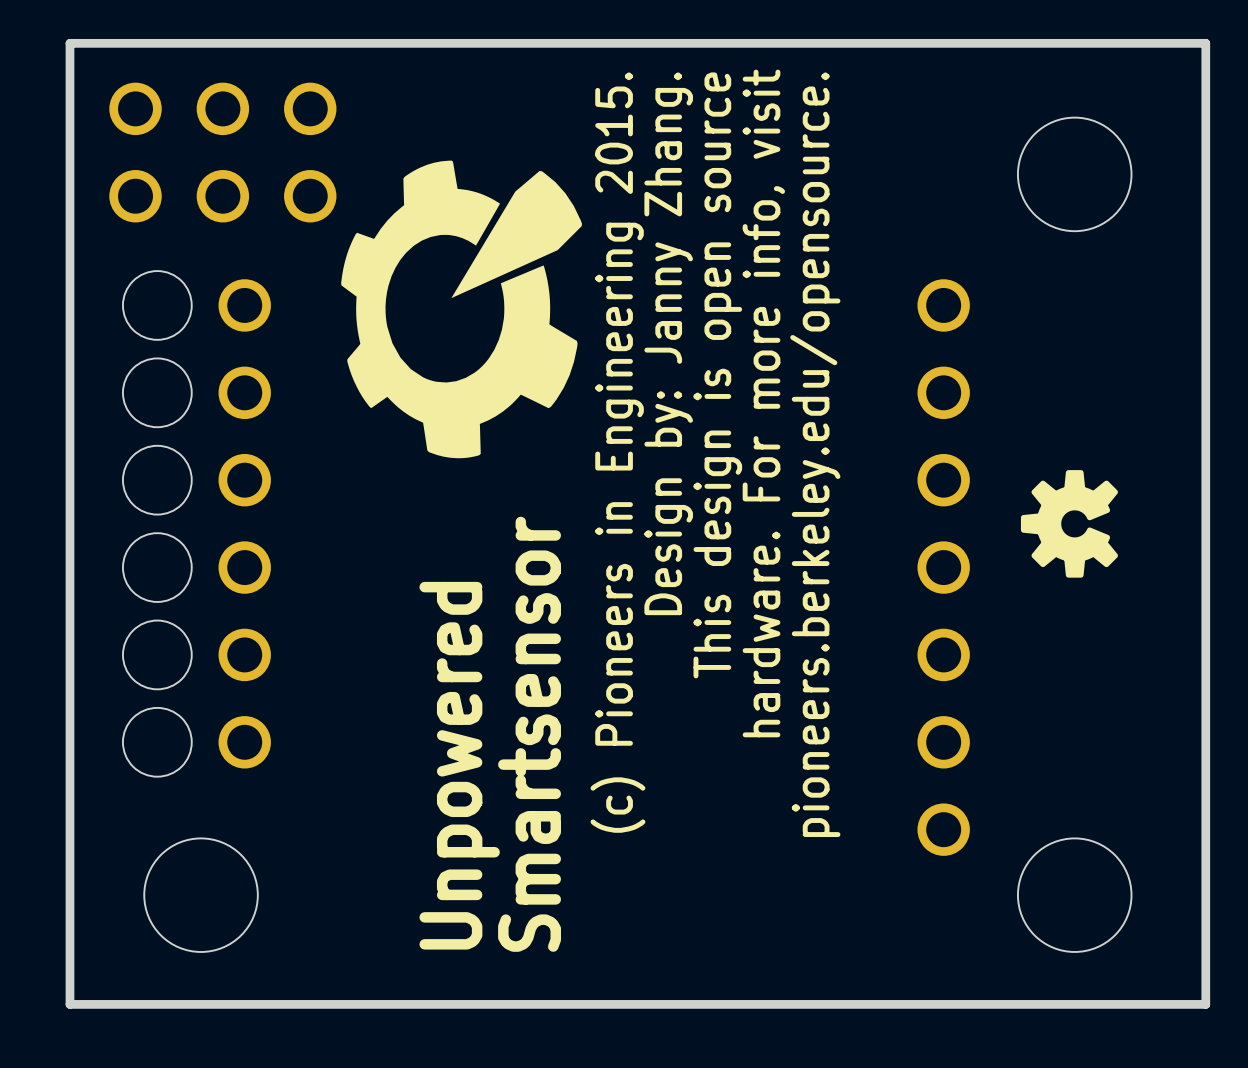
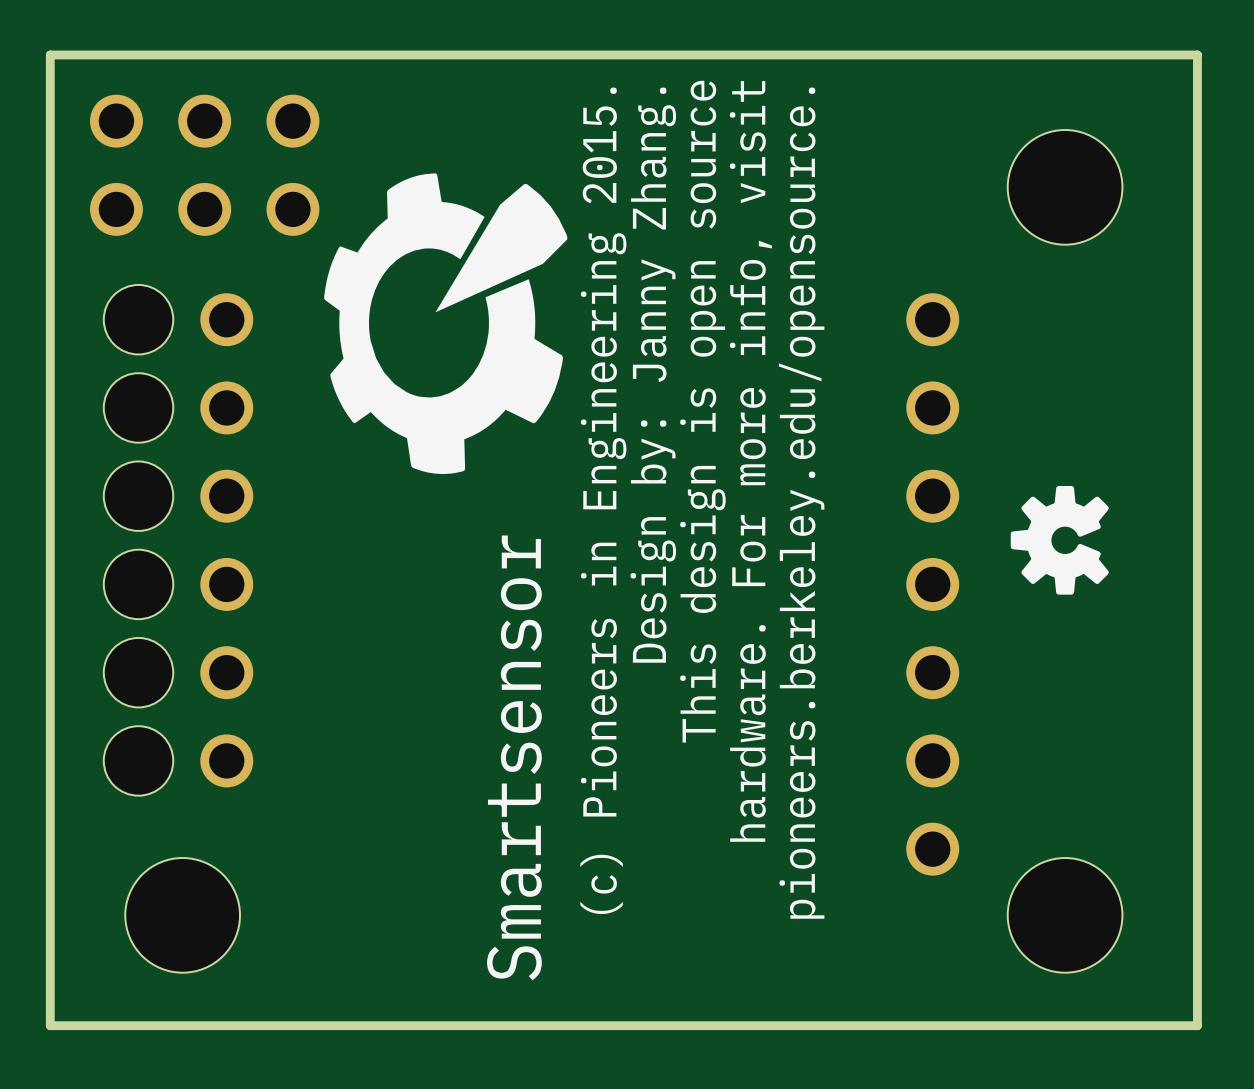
text: Unpowered (459, 765) -> none

